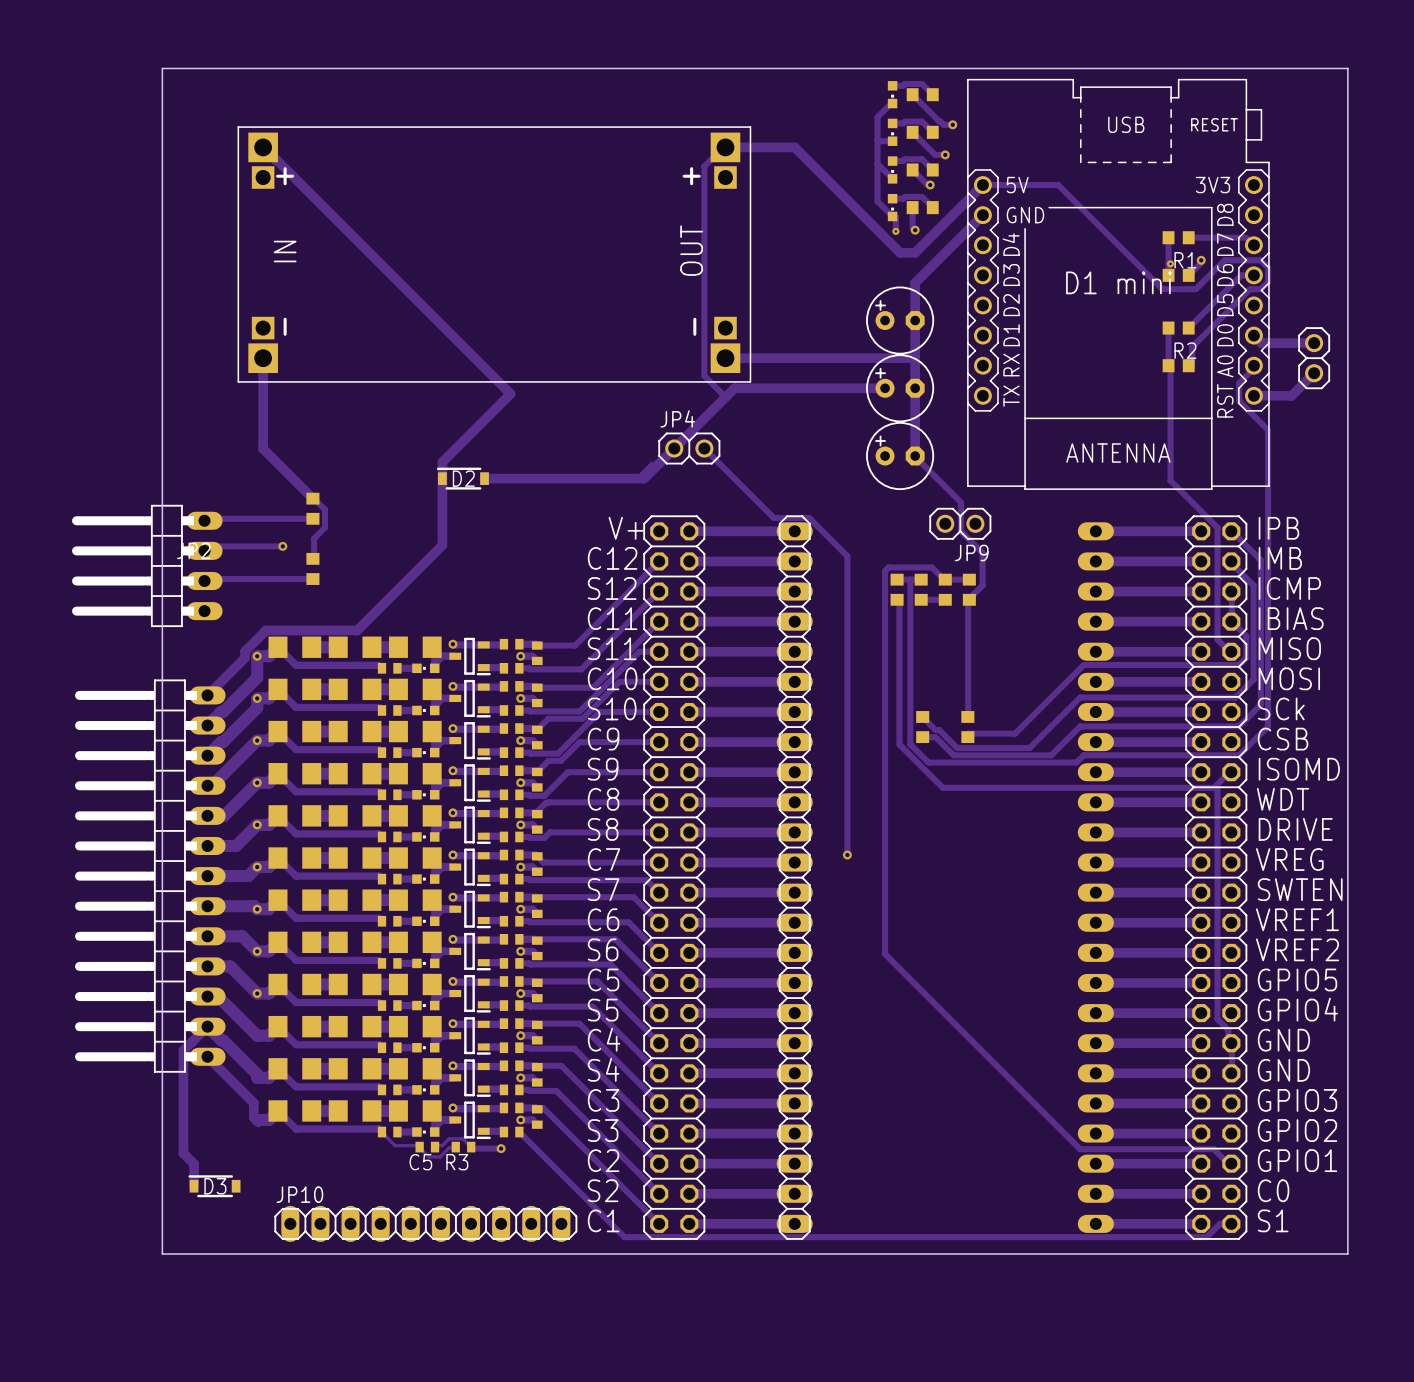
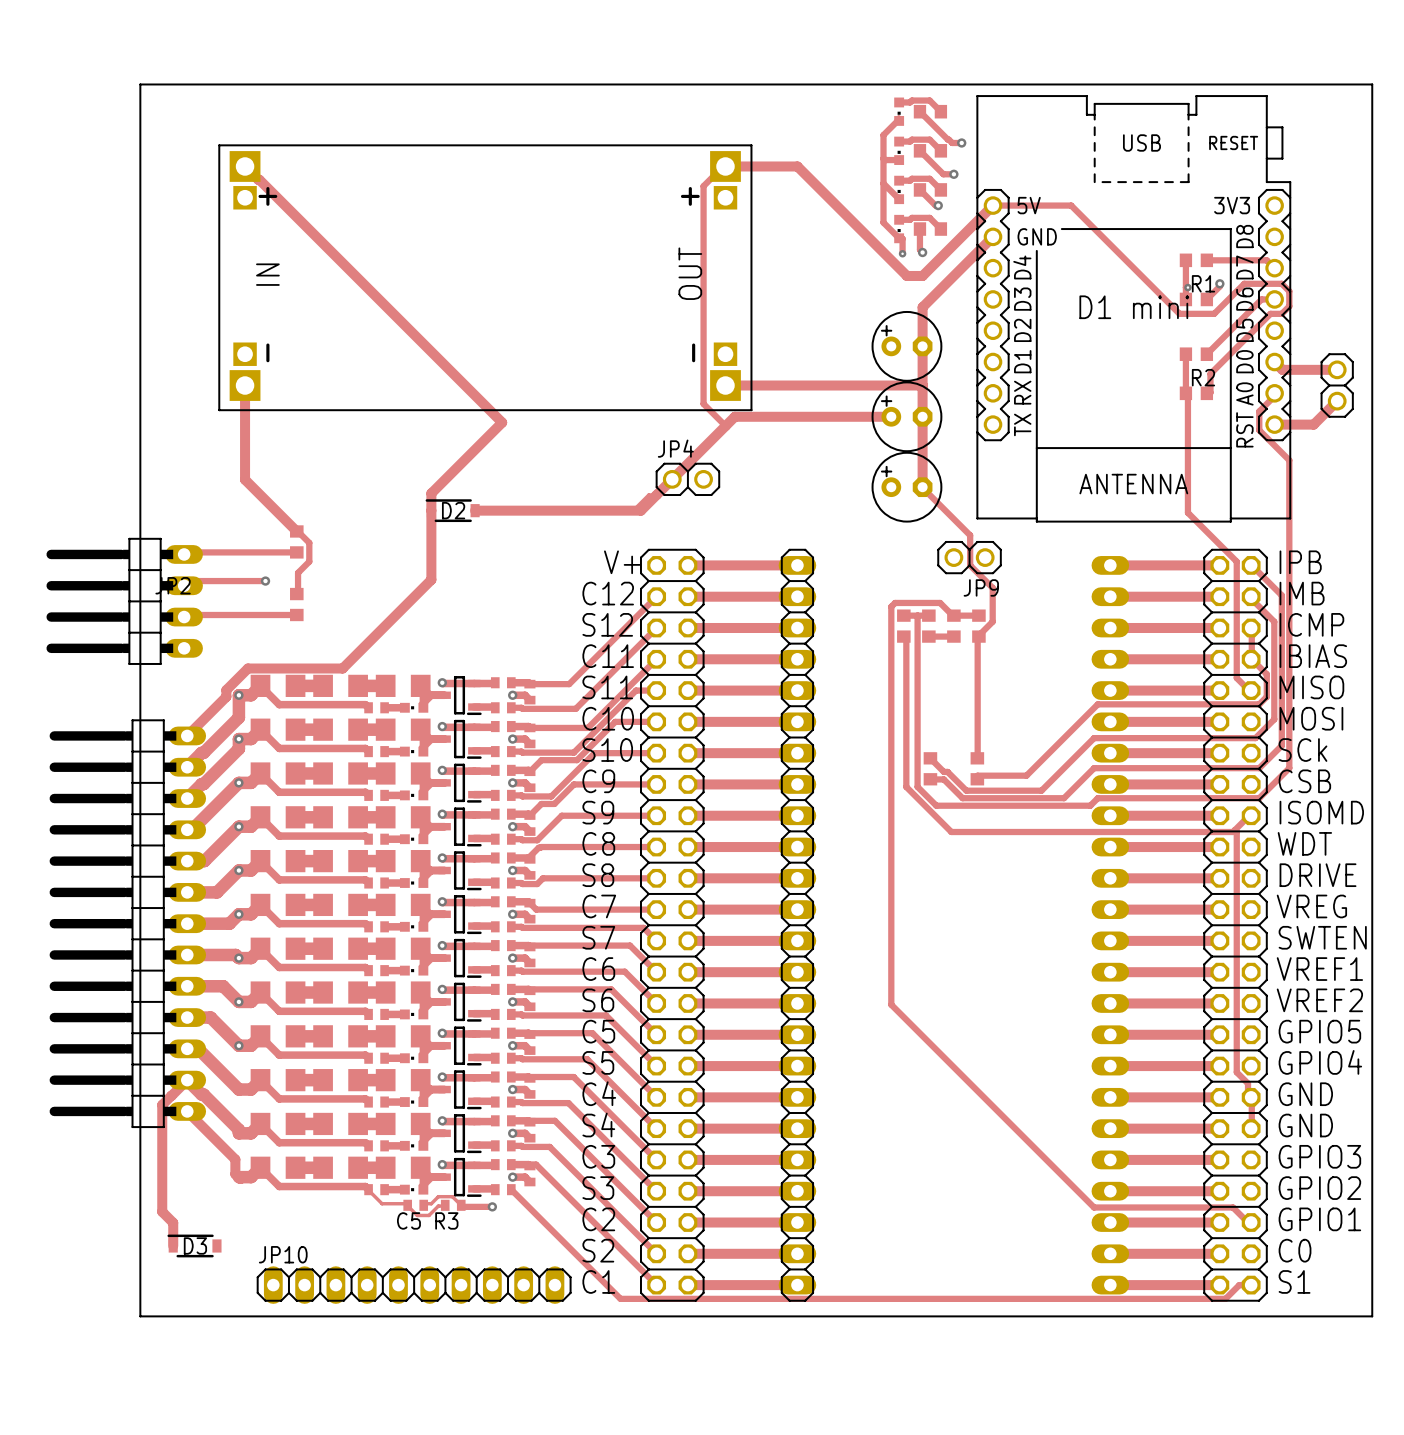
track: (704, 448) (773, 518) (809, 518) (847, 556) (847, 855) -> none
via: (847, 855) -> none

